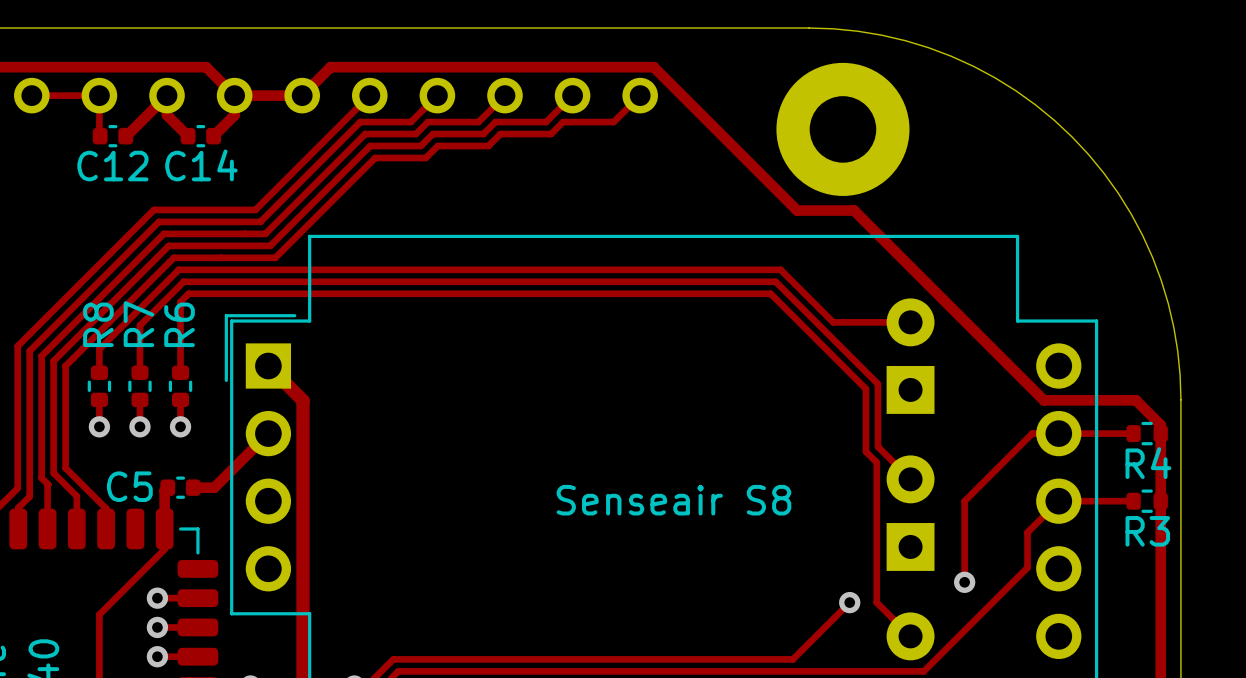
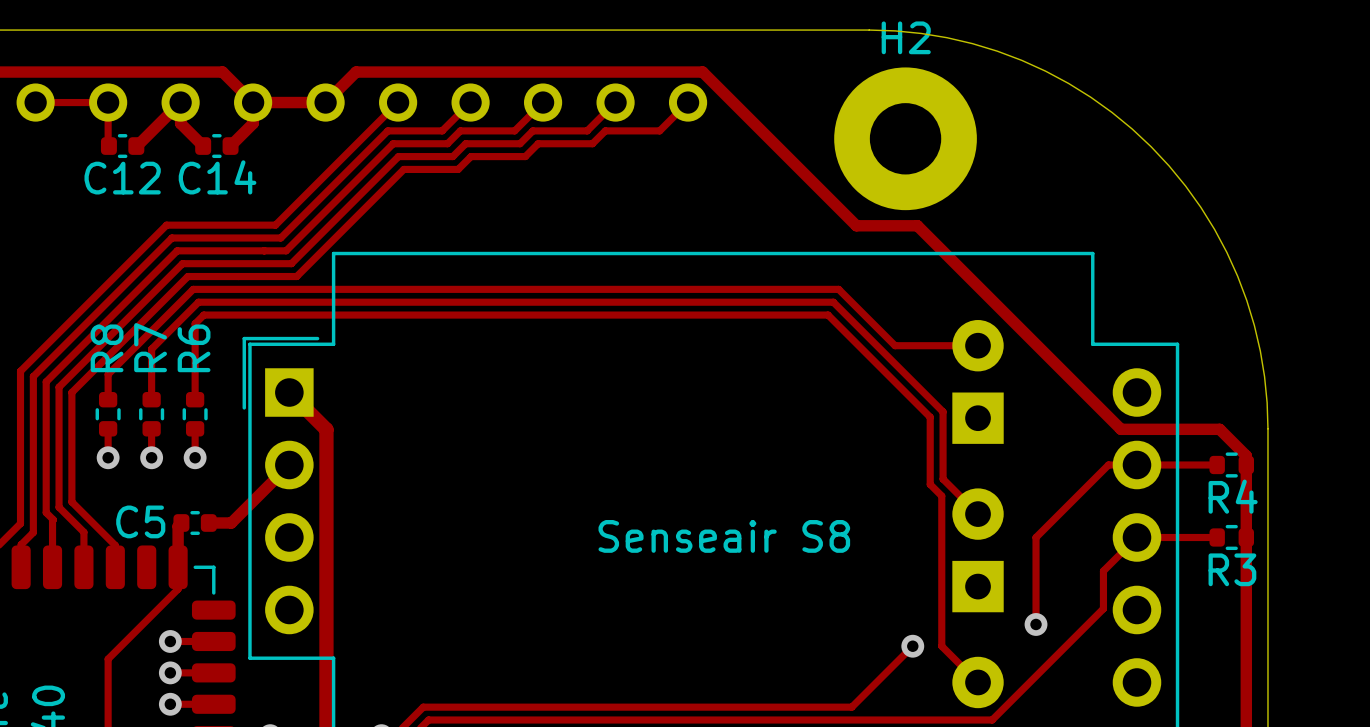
H2 name: none -> H2 (906, 37)

